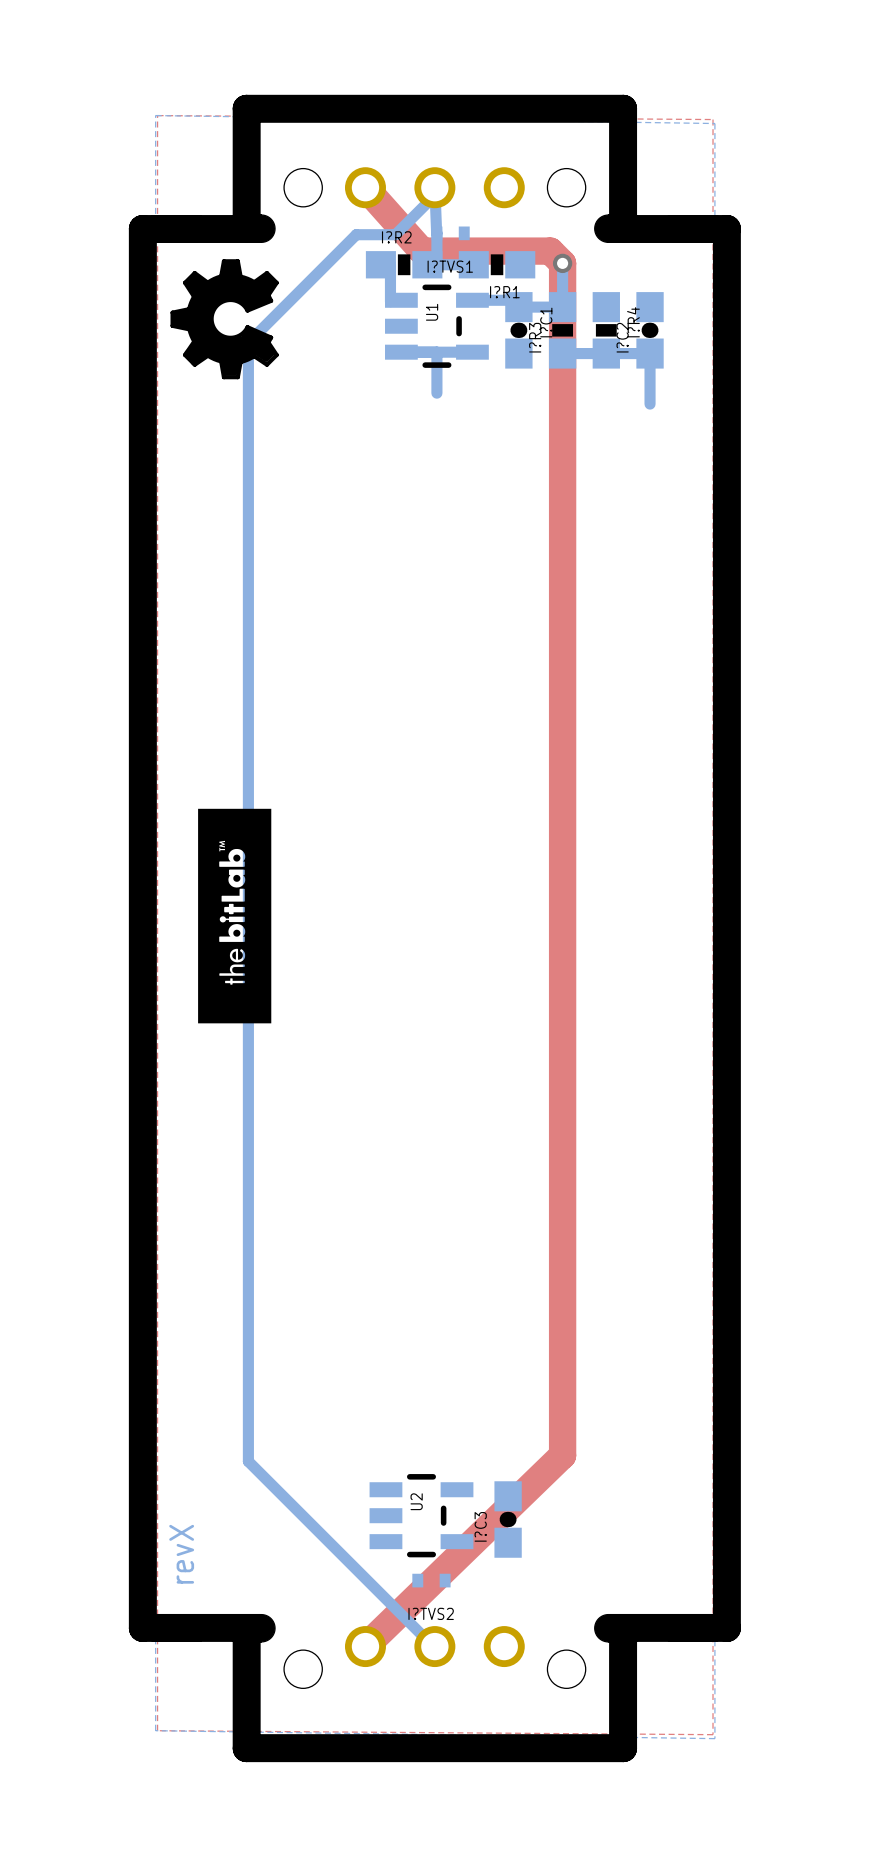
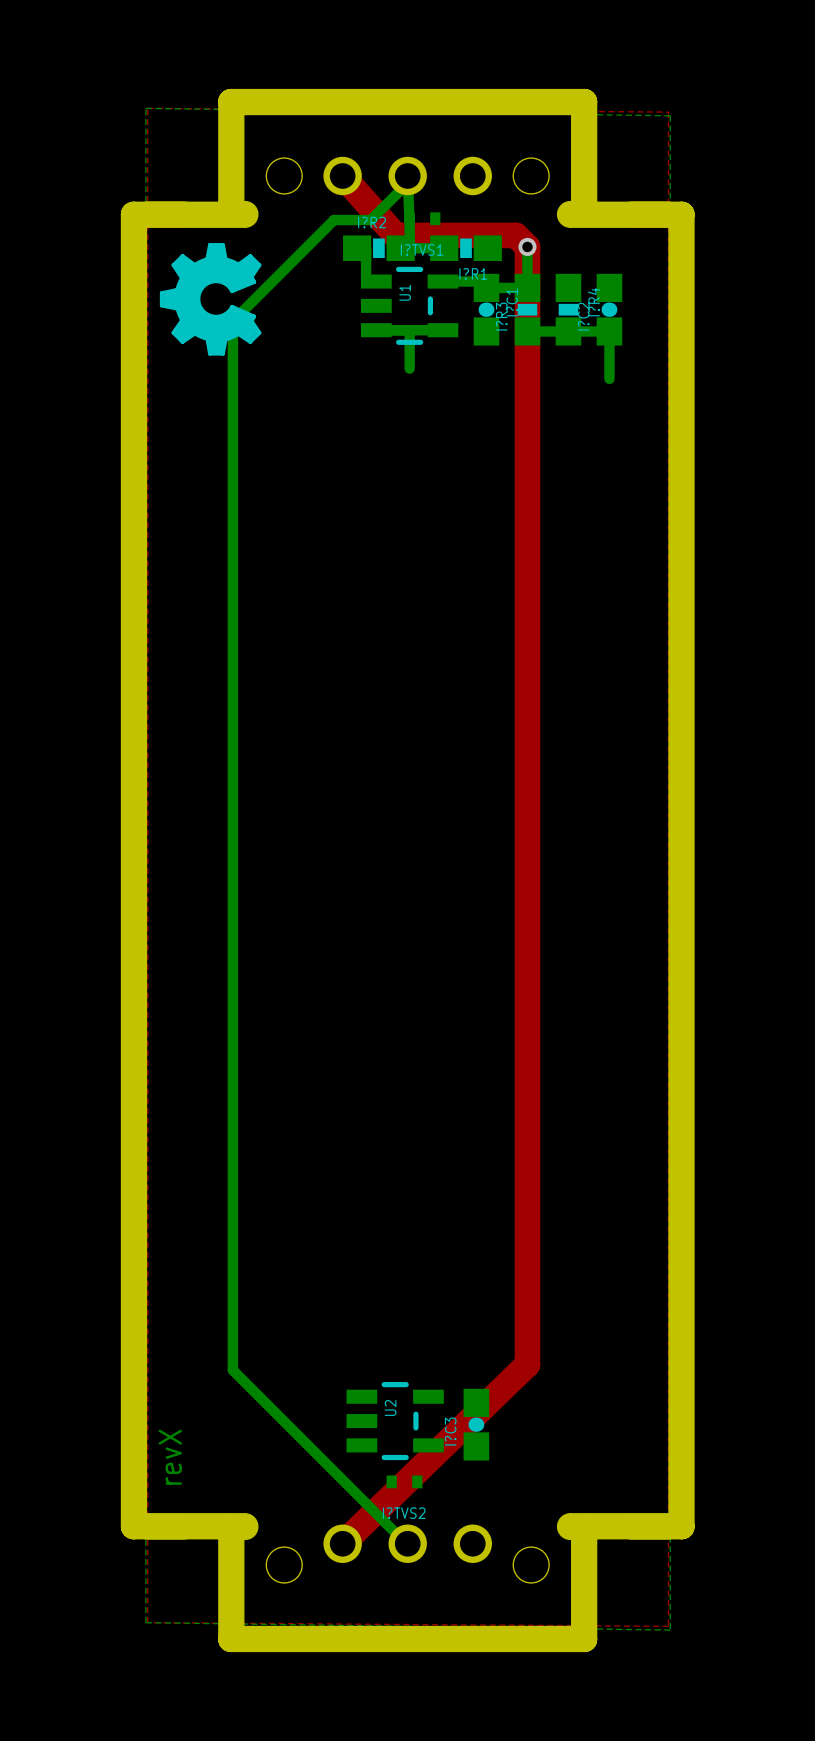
drawing: [198, 808, 272, 1024] -> none

